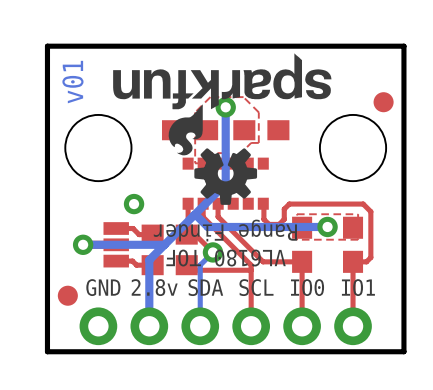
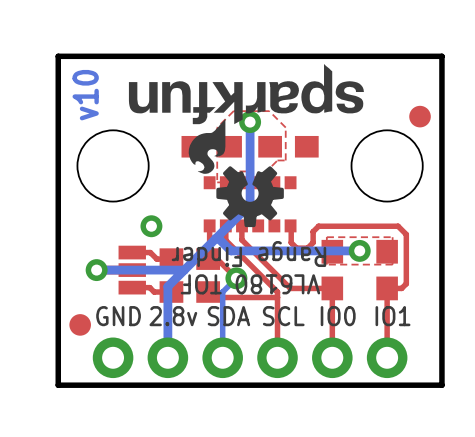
text: v01 (72, 82) -> v10 (85, 95)

